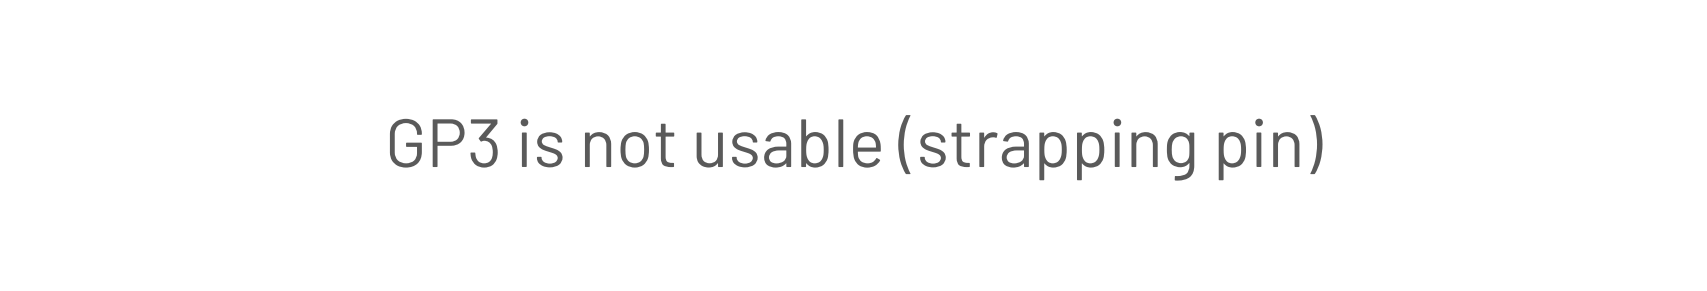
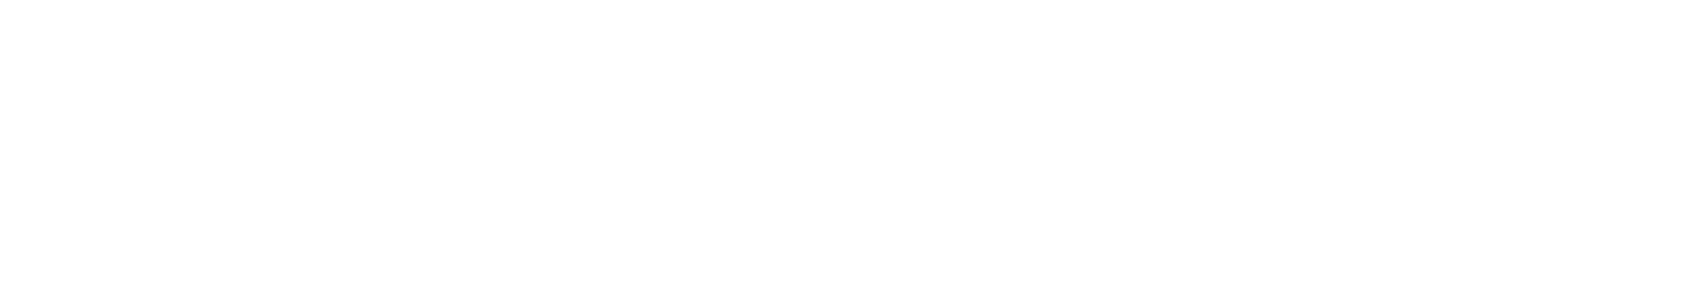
text: GP3 is not usable (strapping pin) (856, 147) -> none

